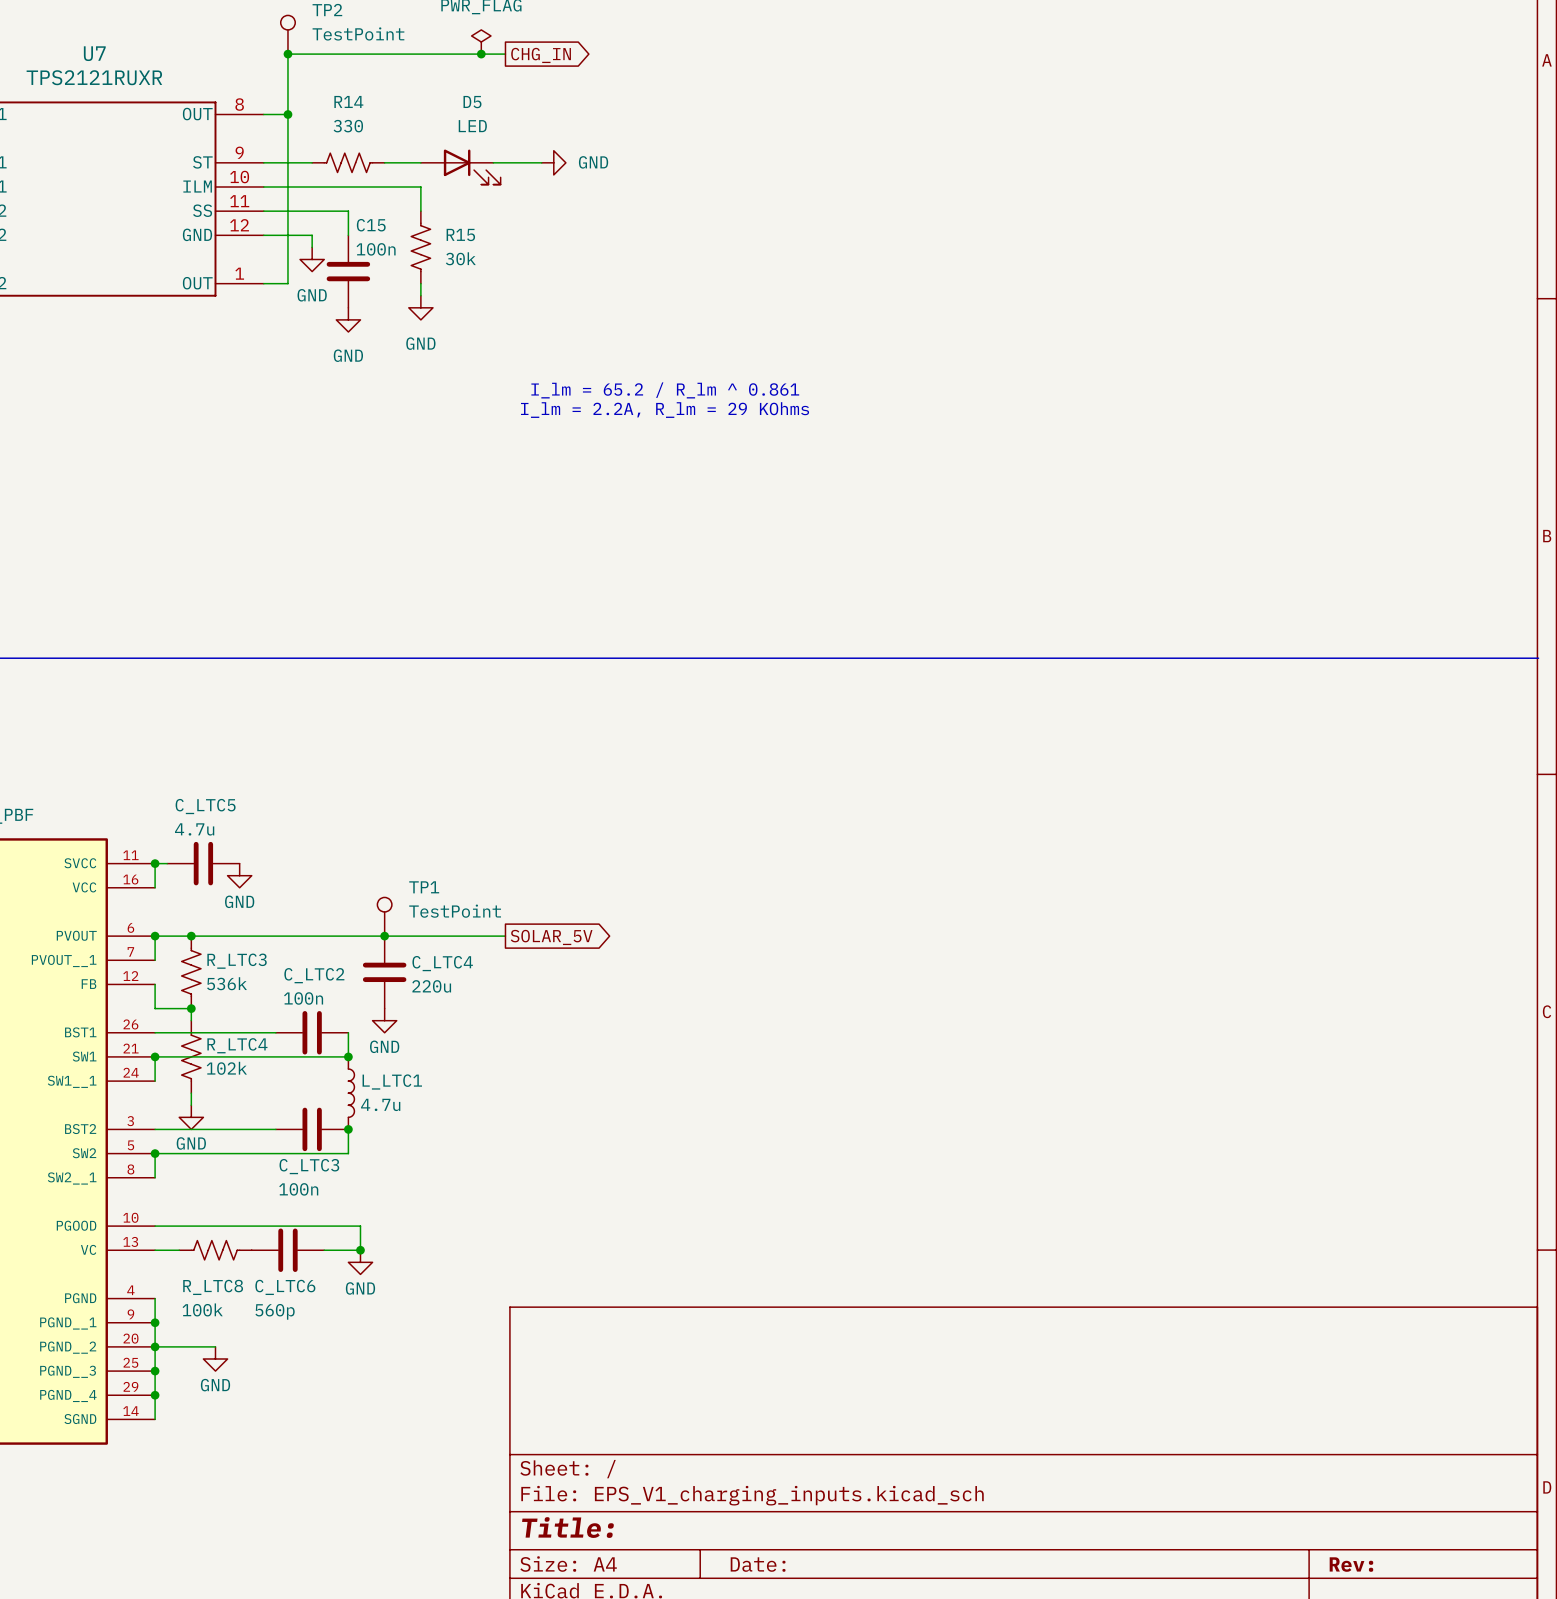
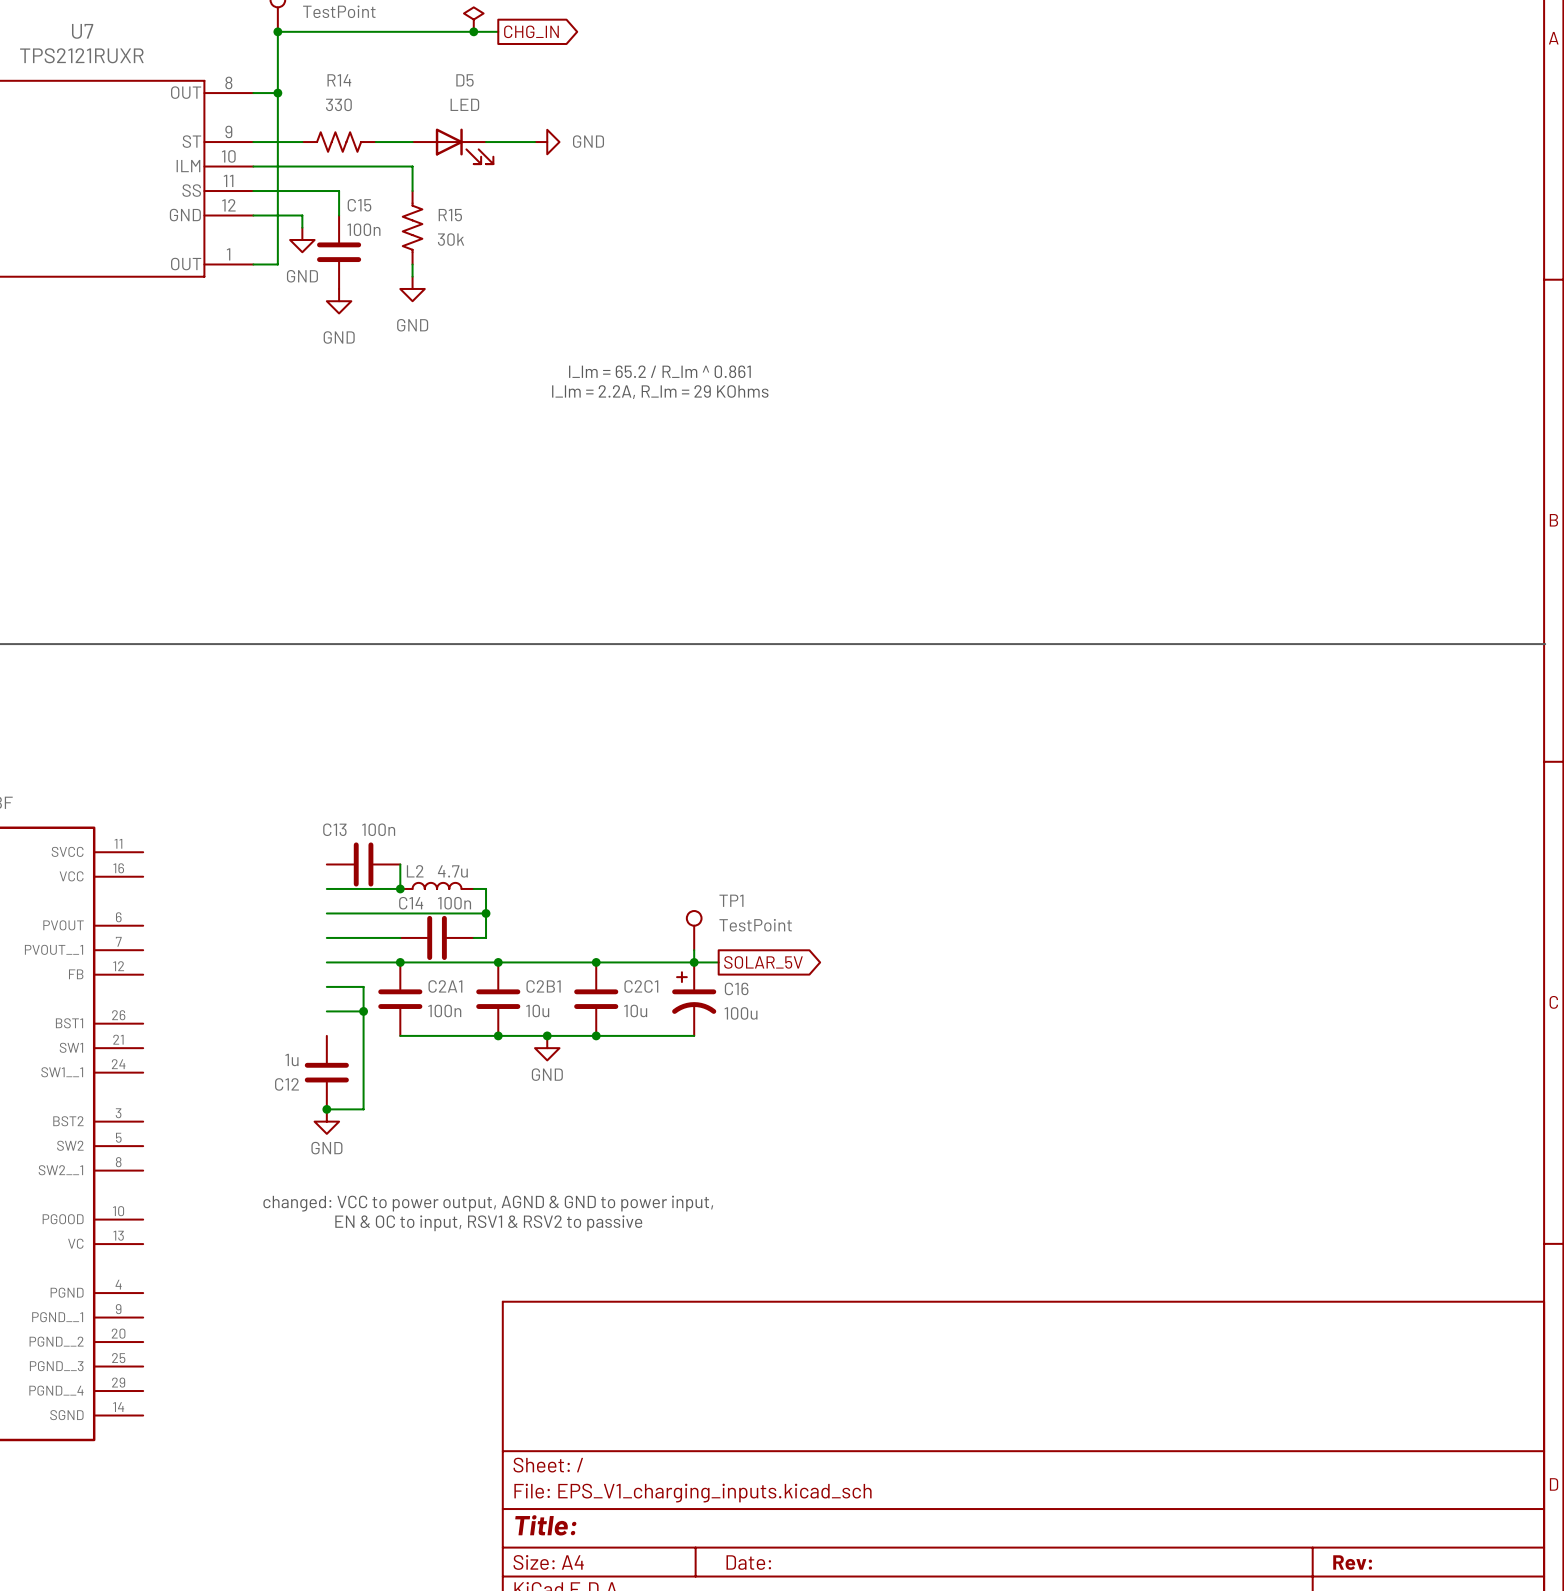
junction: (155, 863) -> none
wire: (167, 863) (155, 863) (155, 887) -> none
C_LTC5: 4.7u (203, 863) -> none
power symbol: GND (239, 875) -> none
C13: none -> 100n (363, 864)
wire: none -> (400, 864) (400, 888) (326, 888)
L2: none -> 4.7u (437, 885)
junction: none -> (400, 888)
wire: none -> (473, 888) (486, 888) (486, 937) (473, 937)
TP1 position: (384, 916) -> (694, 930)
wire: none -> (326, 913) (486, 913)
junction: none -> (486, 913)
junction: (155, 936) -> none
junction: (191, 936) -> none
junction: (384, 936) -> none
wire: (505, 936) (155, 936) (155, 960) -> none
global label position: SOLAR_5V (551, 937) -> SOLAR_5V (763, 962)
wire: none -> (326, 937) (400, 937)
C14: none -> 100n (437, 937)
wire: none -> (694, 950) (694, 962)
R_LTC3: 536k (191, 972) -> none
wire: none -> (326, 962) (718, 962)
C_LTC4: 220u (384, 972) -> none
junction: none -> (400, 962)
junction: none -> (498, 962)
junction: none -> (596, 962)
junction: none -> (694, 962)
wire: (155, 984) (155, 1008) (191, 1008) (191, 1020) -> none
wire: none -> (326, 986) (363, 986) (363, 1109) (326, 1109)
junction: (191, 1008) -> none
C2A1: none -> 100n (400, 999)
C2B1: none -> 10u (498, 999)
C2C1: none -> 10u (596, 999)
C16: none -> 100u (694, 999)
wire: none -> (326, 1011) (363, 1011)
junction: none -> (363, 1011)
power symbol: GND (384, 1020) -> none
wire: (155, 1032) (275, 1032) -> none
C_LTC2: 100n (312, 1032) -> none
wire: (348, 1032) (348, 1056) (155, 1056) (155, 1081) -> none
wire: none -> (400, 1035) (694, 1035)
junction: none -> (498, 1035)
junction: none -> (547, 1035)
junction: none -> (596, 1035)
junction: (155, 1056) -> none
R_LTC4: 102k (191, 1056) -> none
junction: (348, 1056) -> none
power symbol: none -> GND (547, 1048)
C12: none -> 1u (326, 1072)
wire: (191, 1093) (191, 1105) -> none
L_LTC1: 4.7u (351, 1093) -> none
power symbol: GND (191, 1117) -> none
wire: (155, 1129) (275, 1129) -> none
C_LTC3: 100n (312, 1129) -> none
power symbol: none -> GND (326, 1121)
wire: (348, 1129) (348, 1153) (155, 1153) (155, 1177) -> none
junction position: (348, 1129) -> (326, 1109)
junction: (155, 1153) -> none
text: none -> changed: VCC to power output, AGND & GND to power input, (488, 1203)
wire: (155, 1226) (360, 1226) (360, 1250) (324, 1250) -> none
text: none -> EN & OC to input, RSV1 & RSV2 to passive (488, 1223)
wire: (155, 1250) (179, 1250) -> none
R_LTC8: 100k (215, 1250) -> none
C_LTC6: 560p (287, 1250) -> none
junction: (360, 1250) -> none
power symbol: GND (360, 1262) -> none
wire: (155, 1298) (155, 1419) -> none
junction: (155, 1322) -> none
wire: (155, 1346) (215, 1346) -> none
junction: (155, 1346) -> none
power symbol: GND (215, 1358) -> none
junction: (155, 1371) -> none
junction: (155, 1395) -> none

